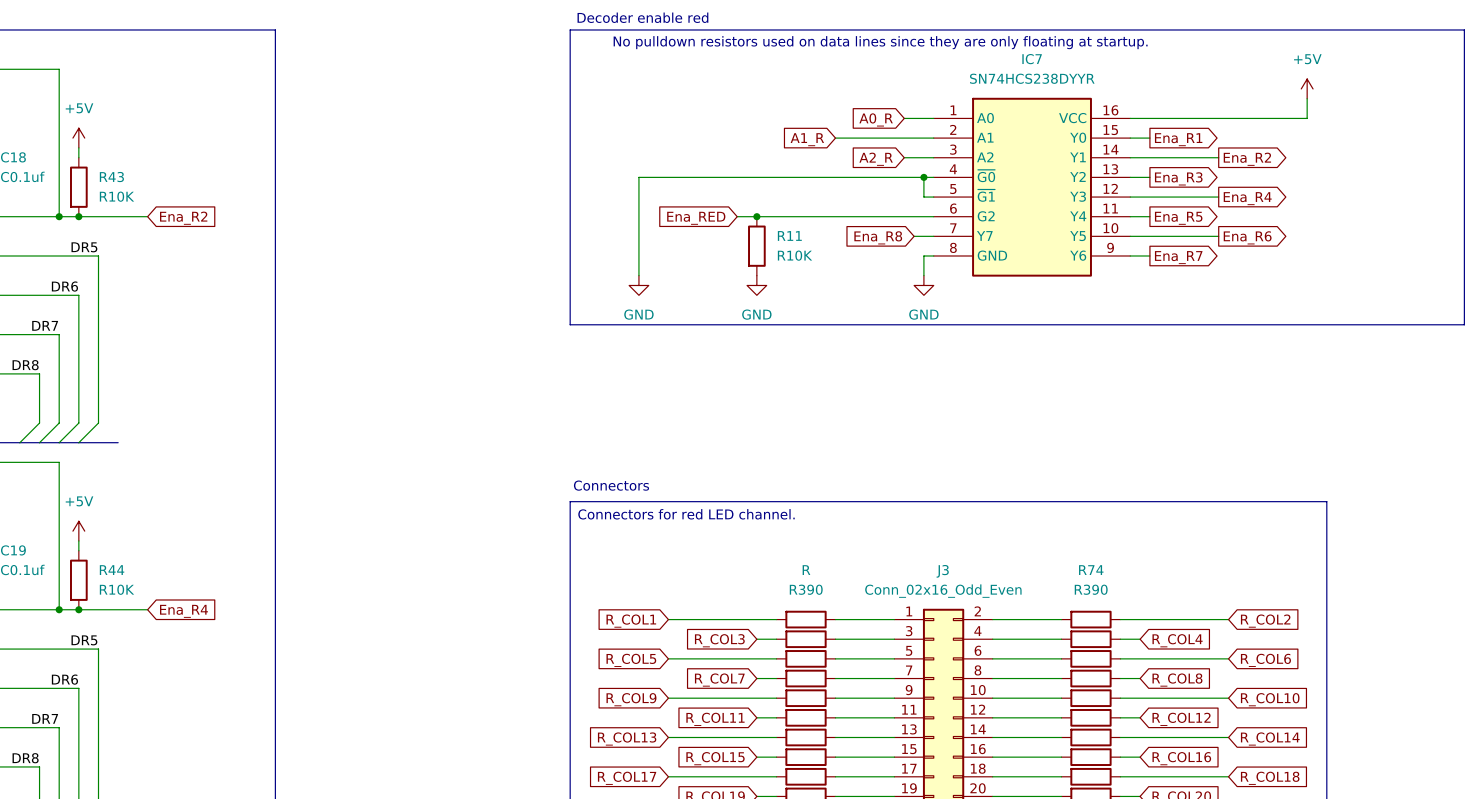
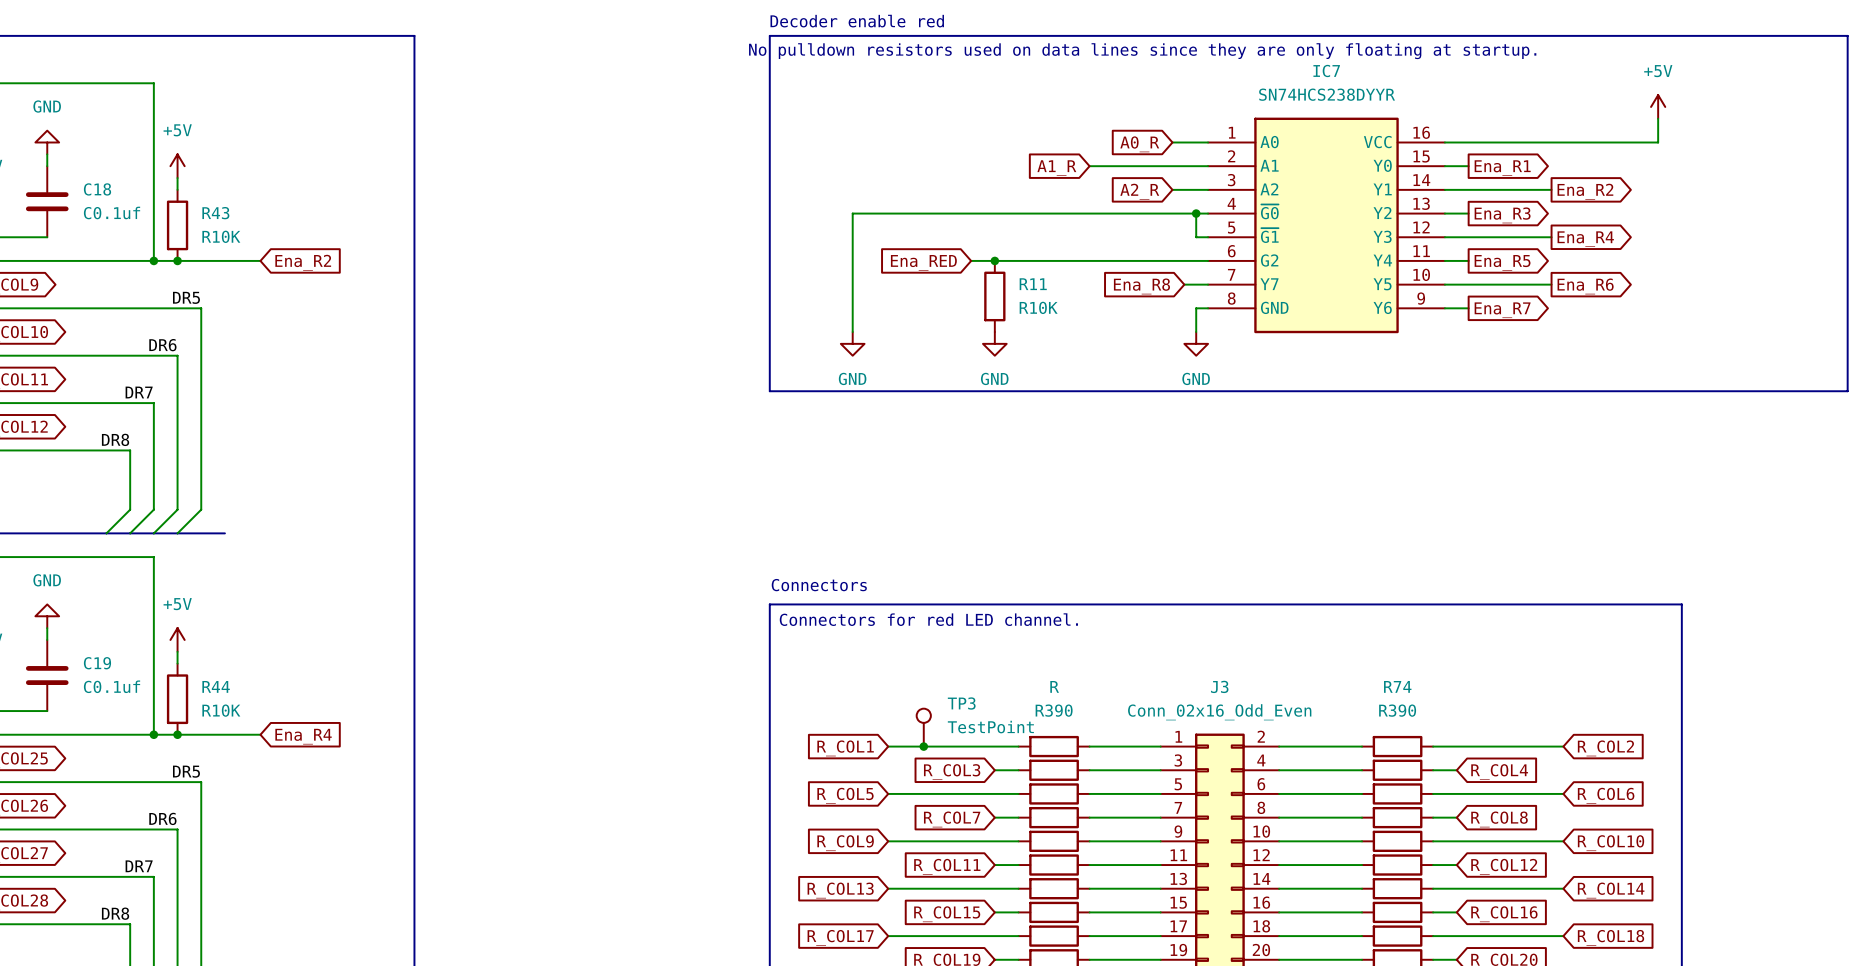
TP3: none -> TestPoint (923, 727)
junction: none -> (923, 746)

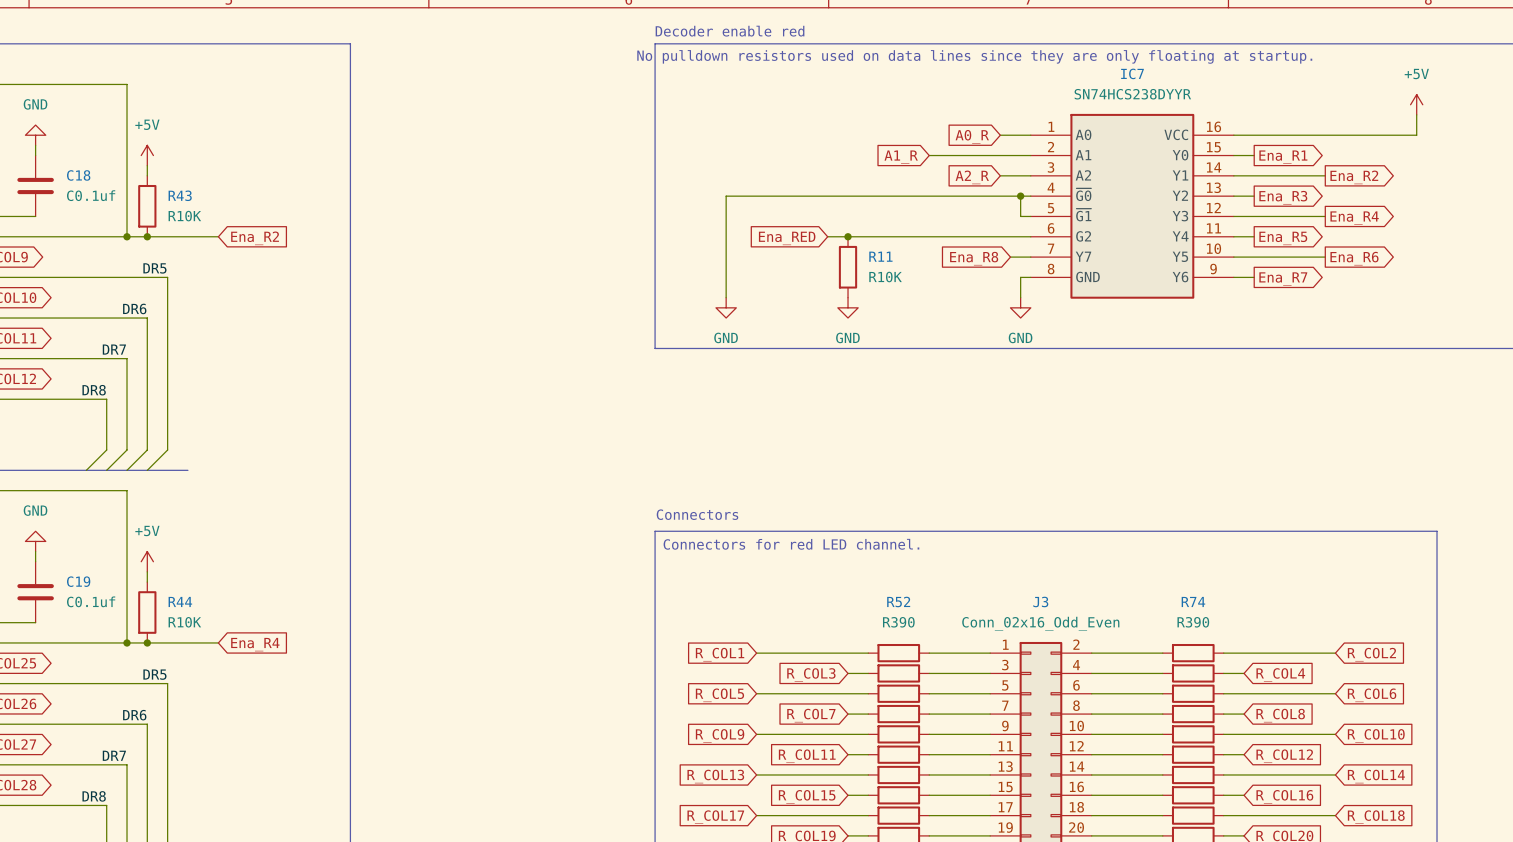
R name: R (1054, 686) -> R52 (898, 601)
TP3: TestPoint (923, 727) -> none
junction: (923, 746) -> none

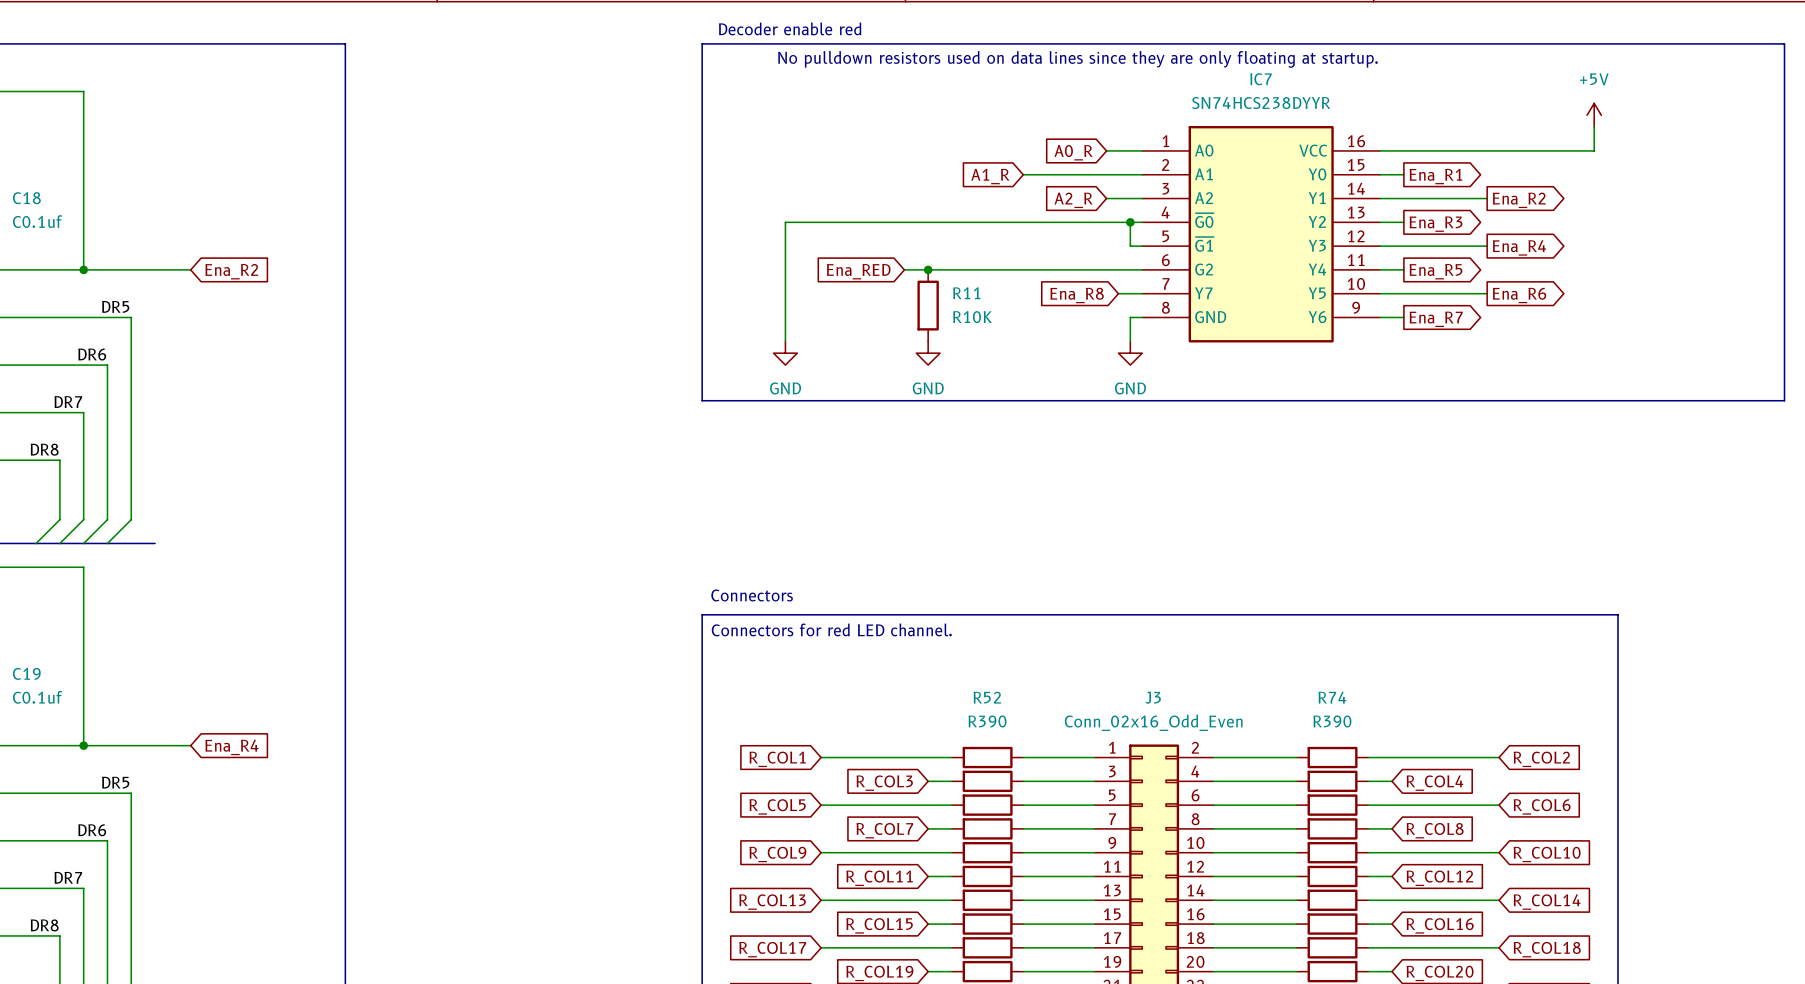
power symbol: +5V (147, 155) -> none
wire: (147, 165) (147, 175) -> none
R43: R10K (147, 206) -> none
junction: (147, 236) -> none
power symbol: +5V (147, 561) -> none
wire: (147, 571) (147, 582) -> none
R44: R10K (147, 612) -> none
junction: (147, 642) -> none

